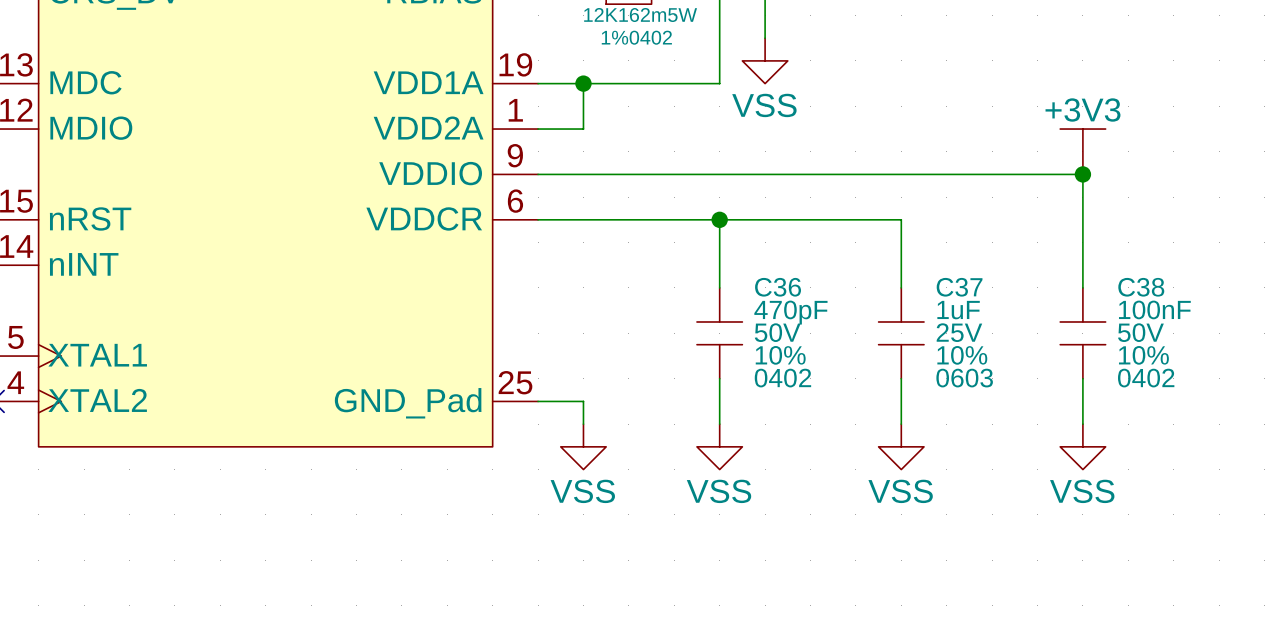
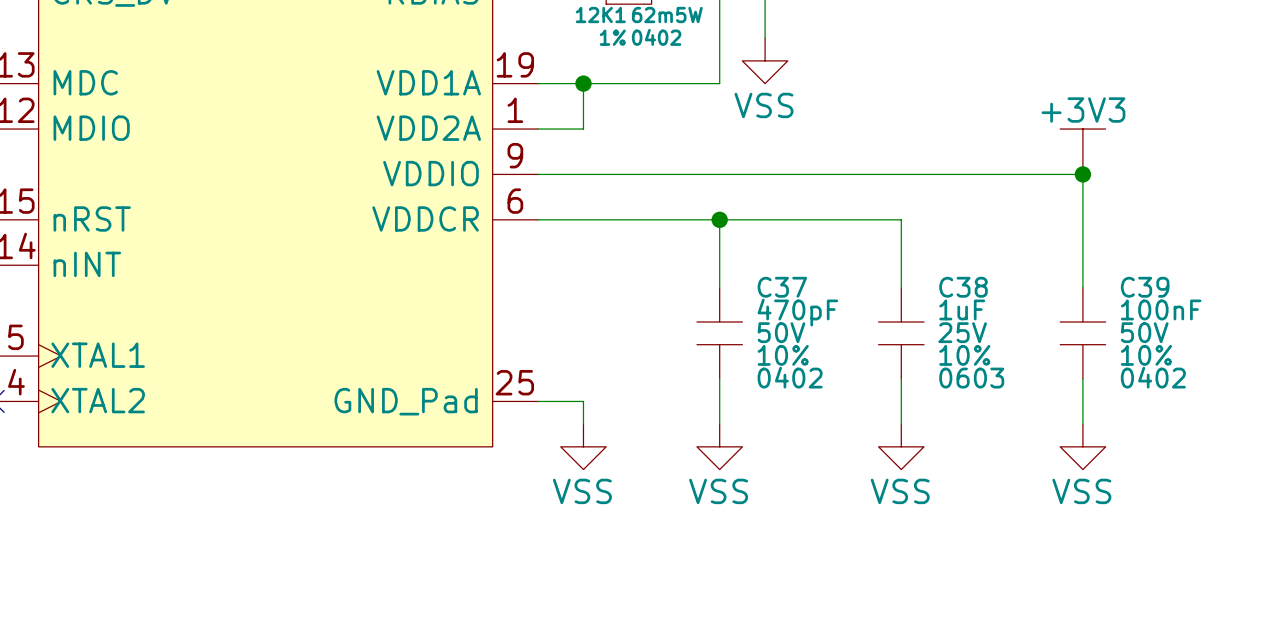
C36 name: C36 (778, 287) -> C37 (782, 287)
C37 name: C37 (959, 287) -> C38 (963, 287)
C38 name: C38 (1141, 287) -> C39 (1145, 287)

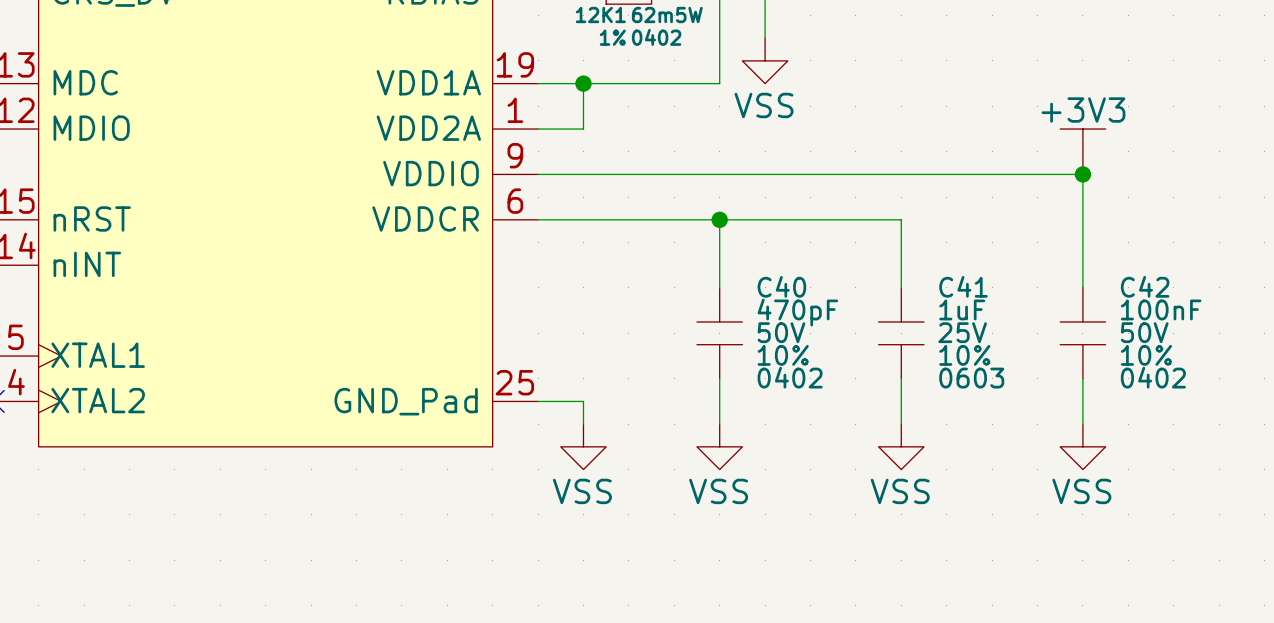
C37 name: C37 (782, 287) -> C40 (781, 286)
C38 name: C38 (963, 287) -> C41 (963, 286)
C39 name: C39 (1145, 287) -> C42 (1145, 286)

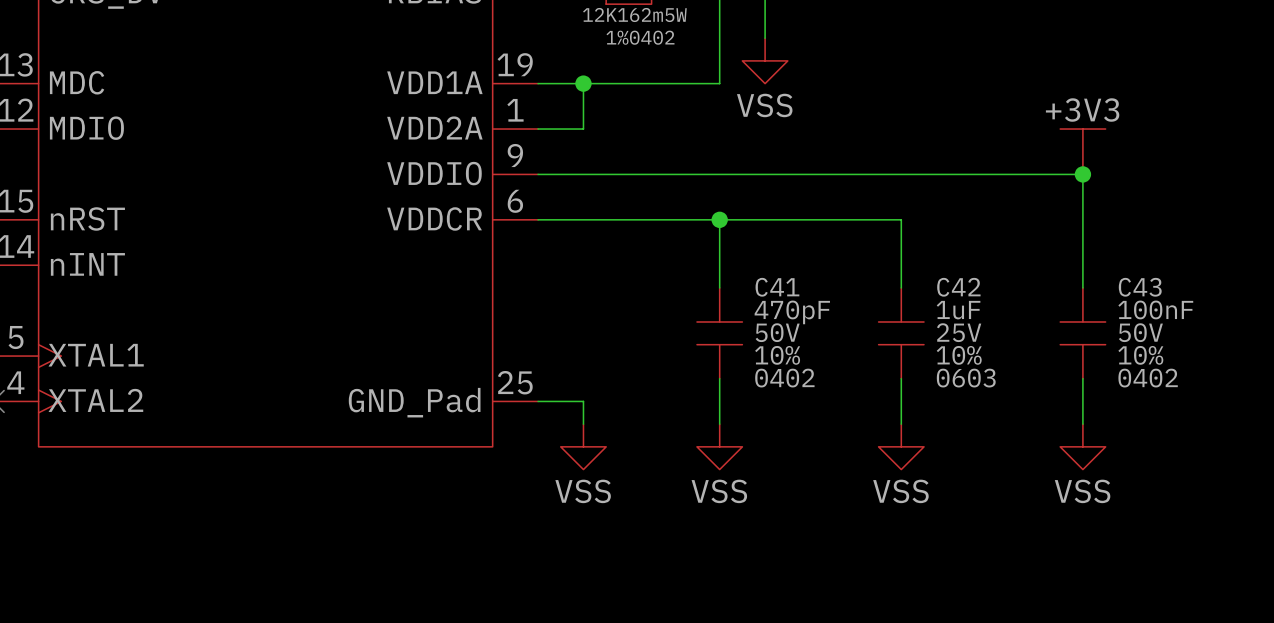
C40 name: C40 (781, 286) -> C41 (777, 287)
C41 name: C41 (963, 286) -> C42 (958, 287)
C42 name: C42 (1145, 286) -> C43 (1140, 287)

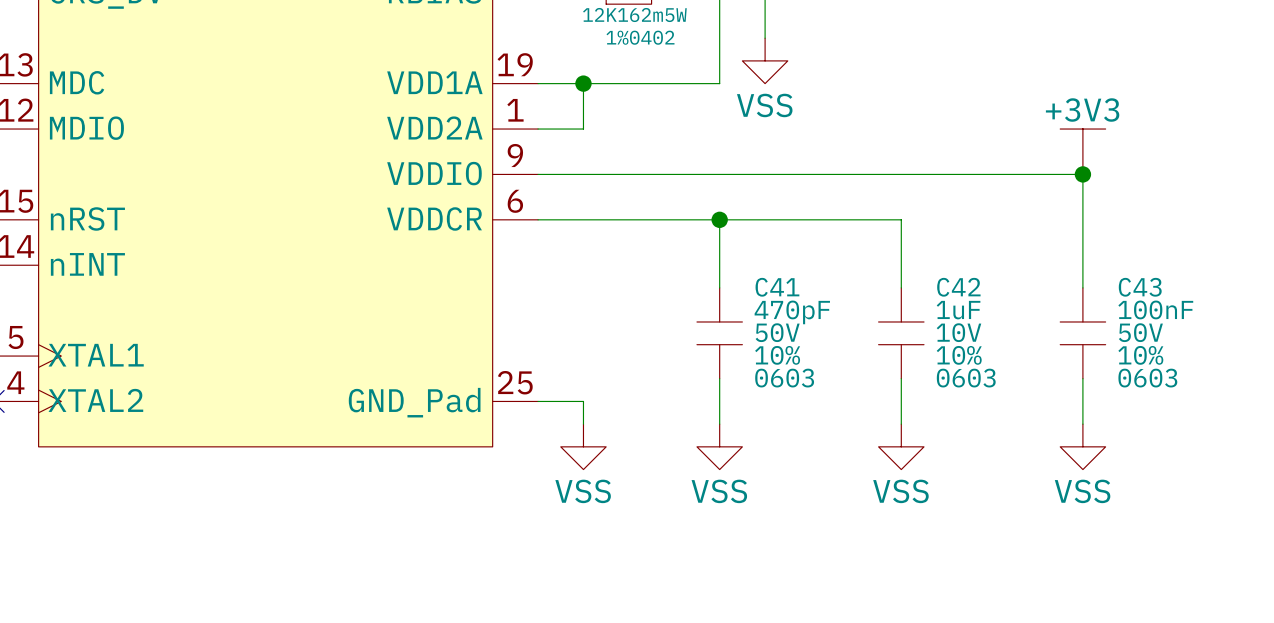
C42 text: 25V (959, 332) -> 10V (958, 332)
C41 text: 0402 (784, 378) -> 0603 (784, 378)
C43 text: 0402 (1148, 378) -> 0603 (1147, 378)

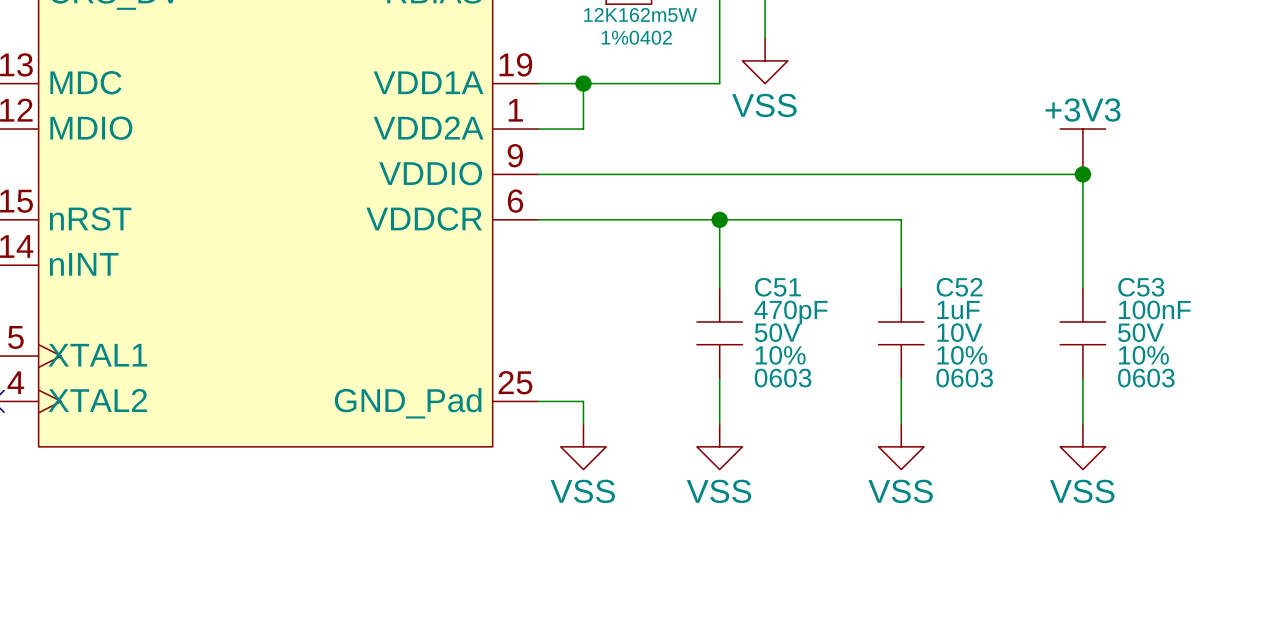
C41 name: C41 (777, 287) -> C51 (777, 287)
C42 name: C42 (958, 287) -> C52 (959, 287)
C43 name: C43 (1140, 287) -> C53 (1141, 287)

